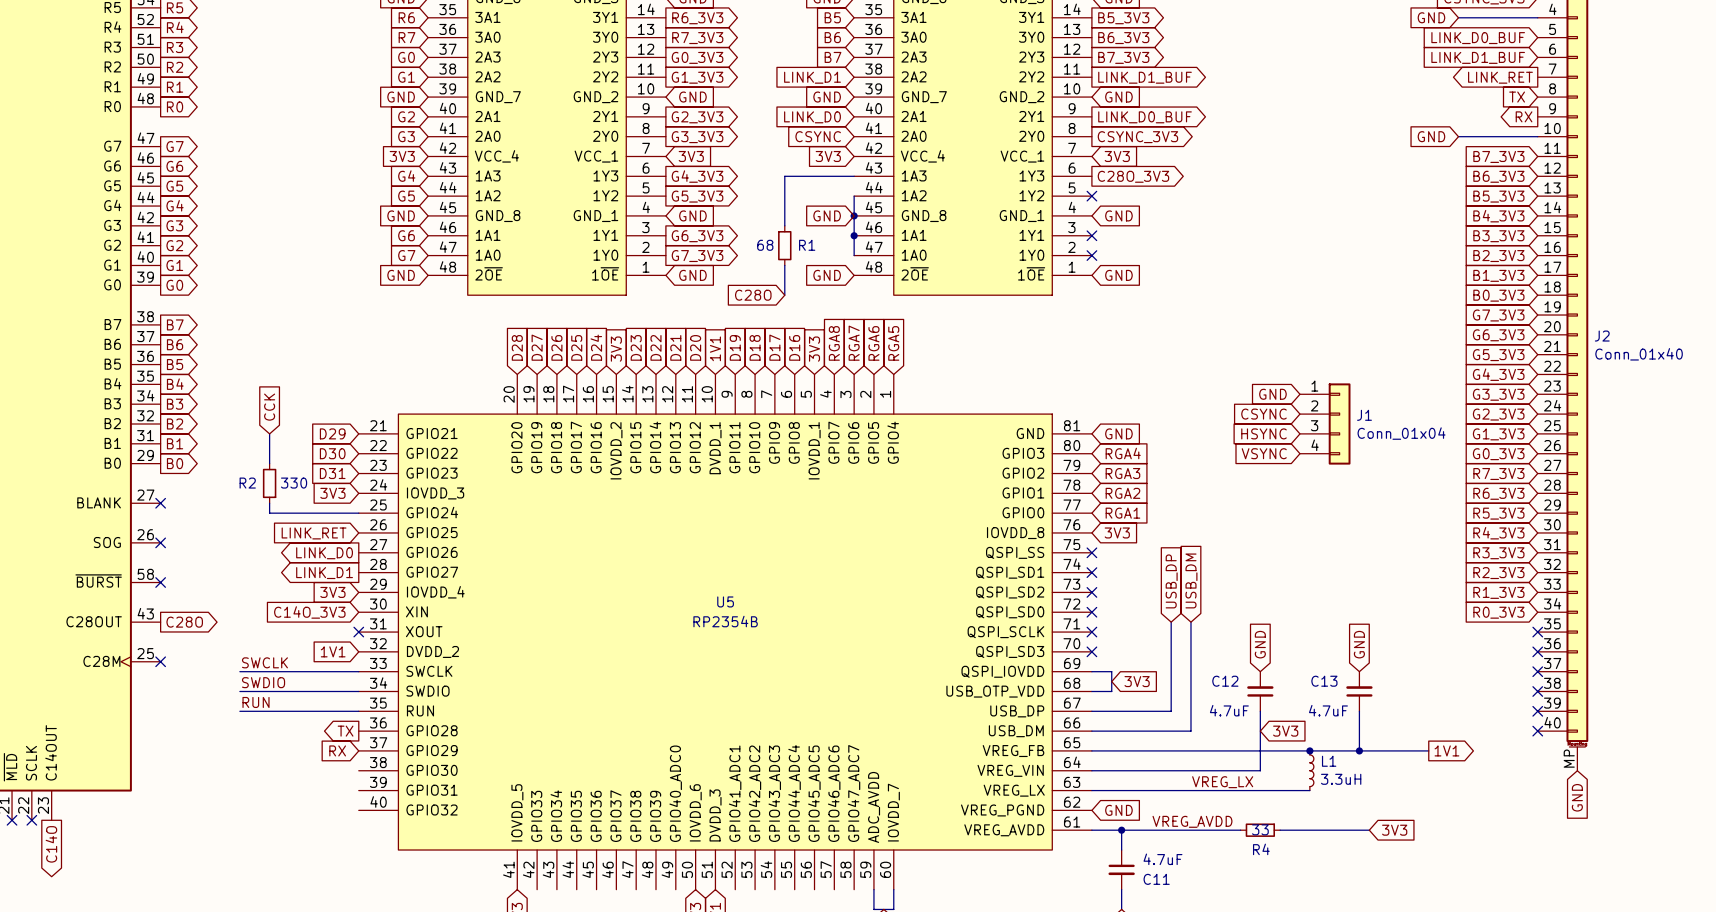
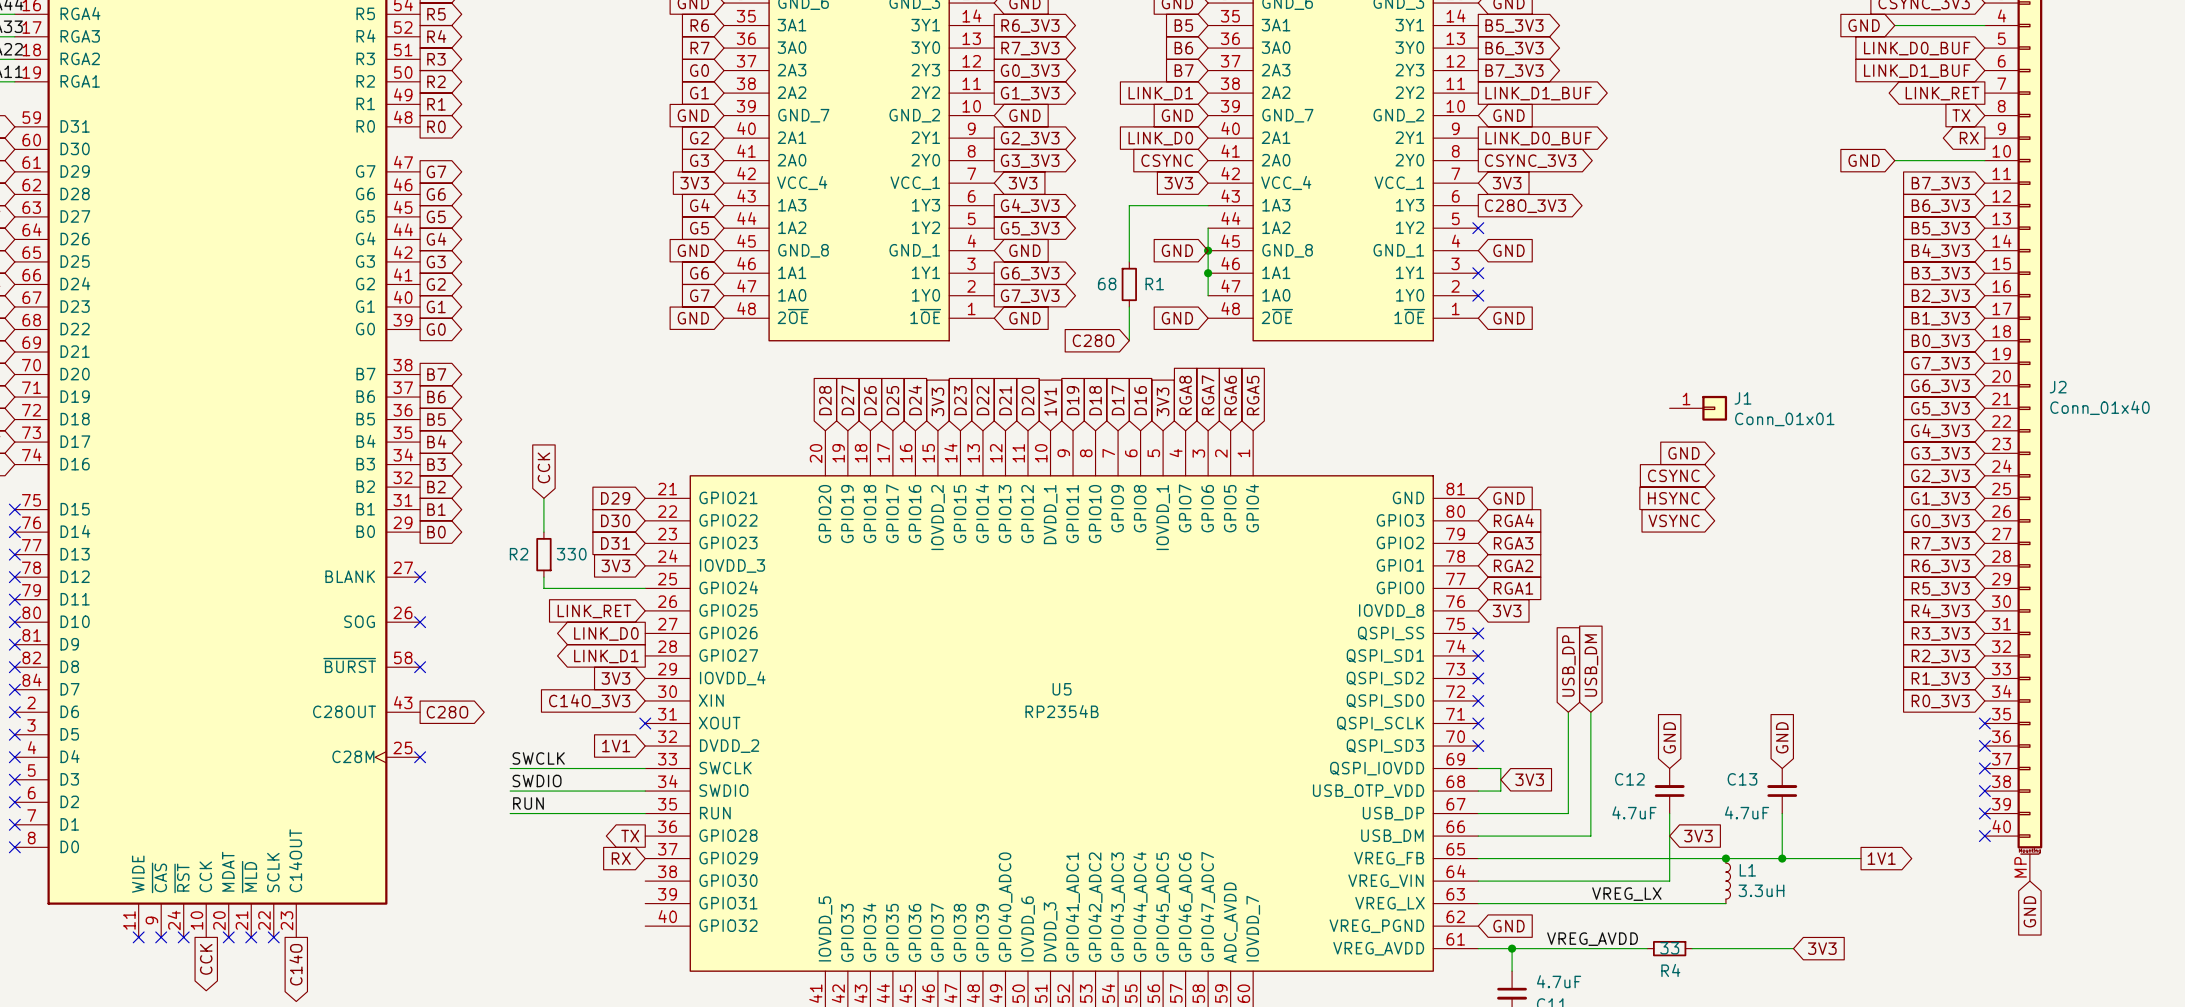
J1 symbol: [1299, 383, 1351, 465] -> [1669, 395, 1728, 421]
J1 value: Conn_01x04 (1401, 433) -> Conn_01x01 (1784, 419)

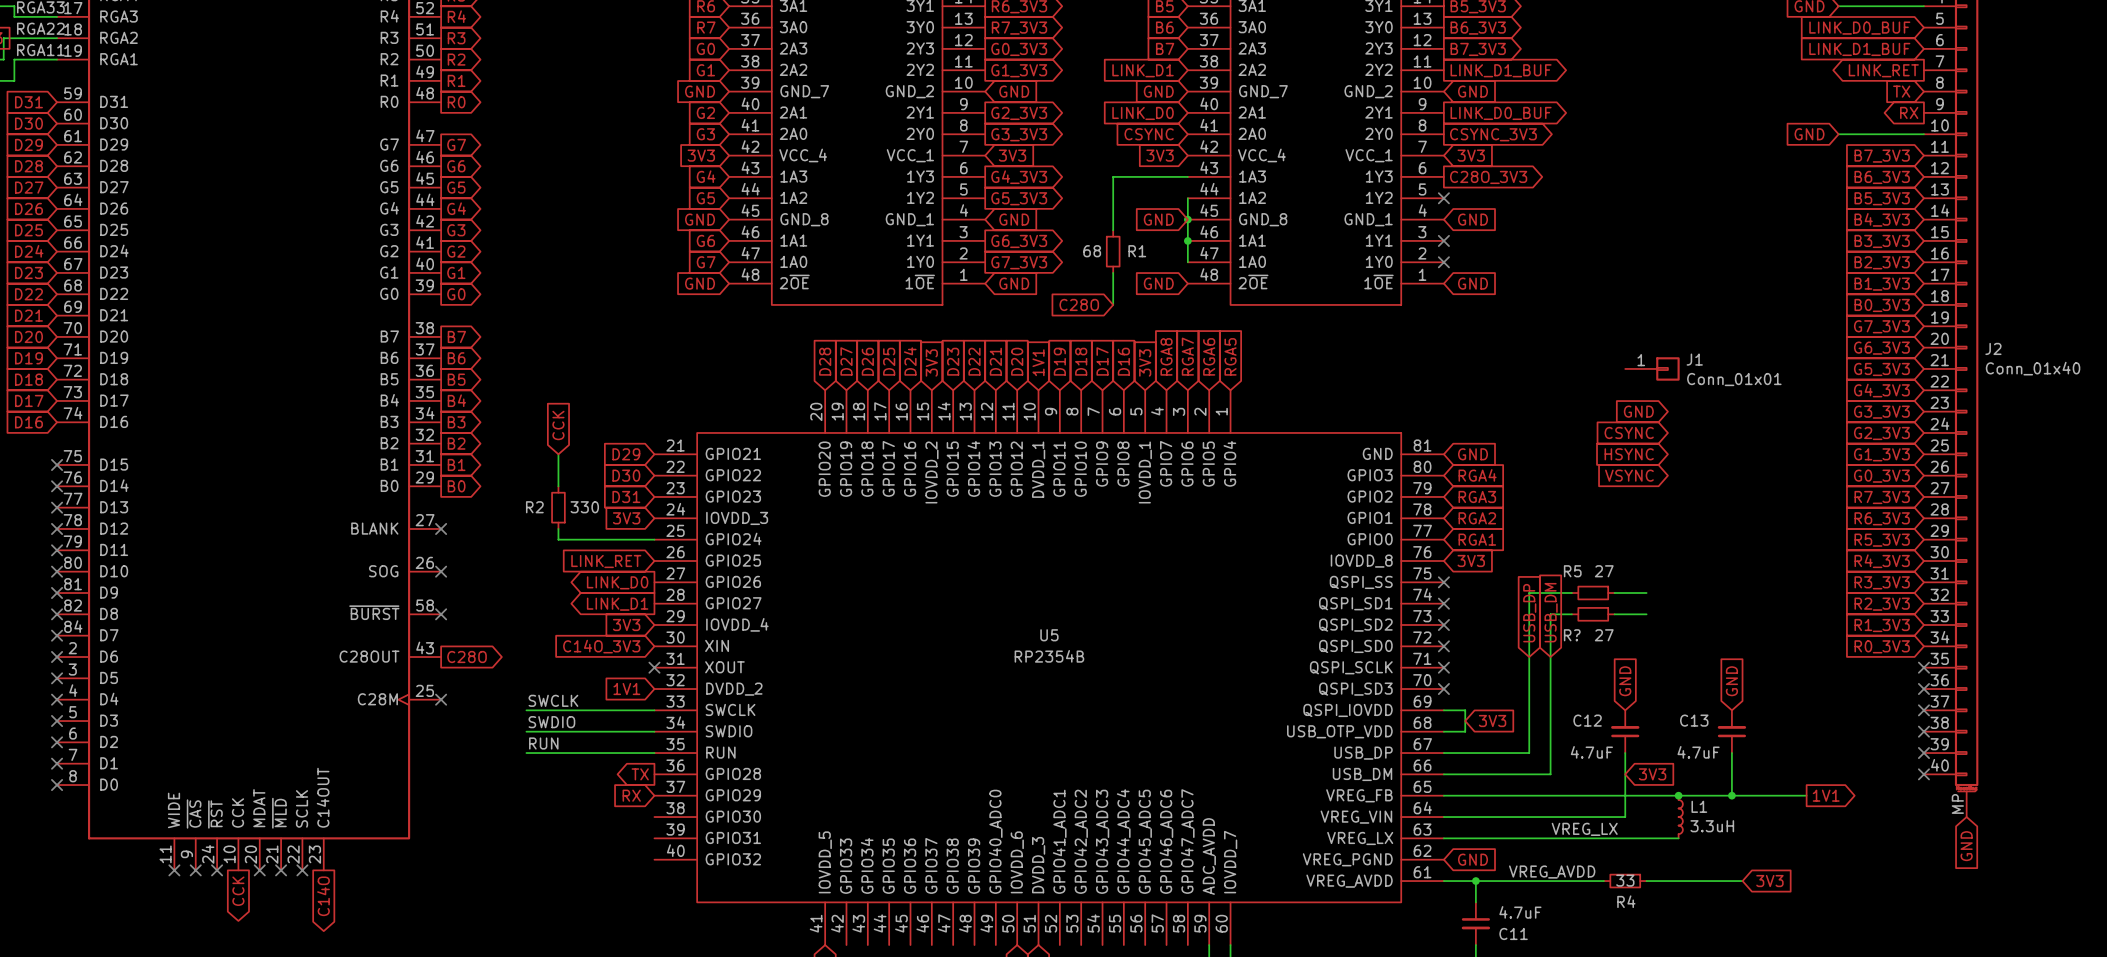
wire: none -> (1571, 592) (1529, 592) (1529, 657)
R5: none -> 27 (1593, 592)
wire: none -> (1614, 592) (1646, 592)
wire: none -> (1571, 614) (1550, 614) (1550, 657)
R?: none -> 27 (1593, 614)
wire: none -> (1614, 614) (1646, 614)

